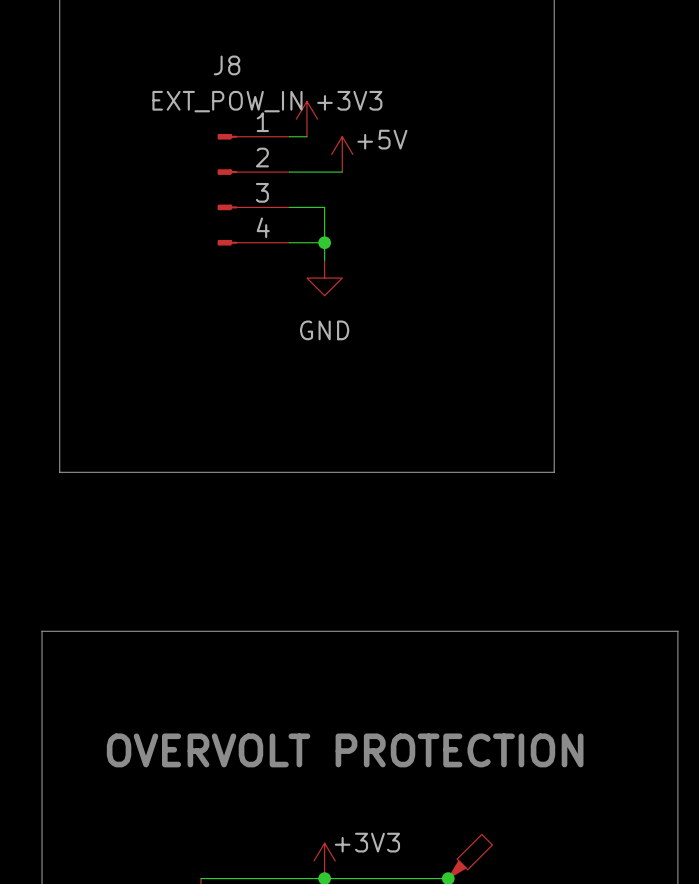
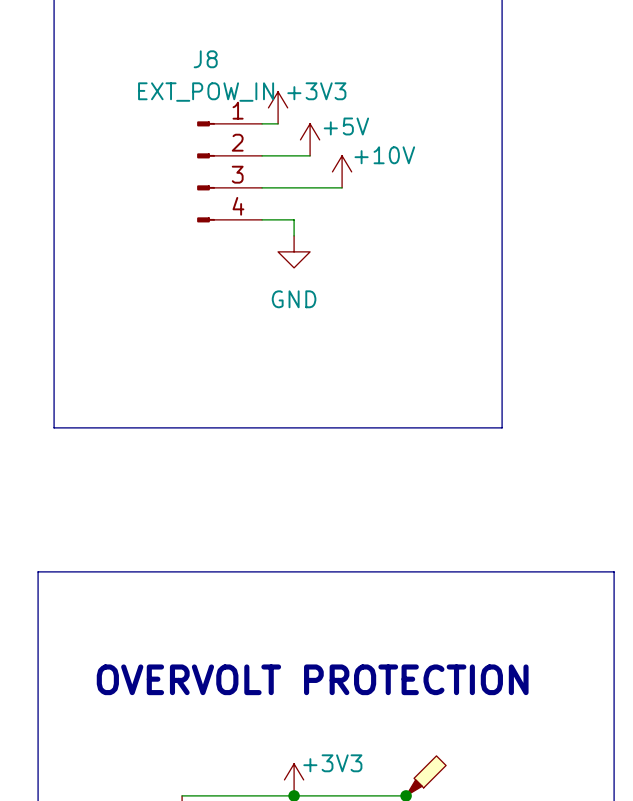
power symbol: none -> +10V (342, 171)
wire: (324, 207) (324, 242) -> (294, 187) (342, 187)
junction: (324, 242) -> none

